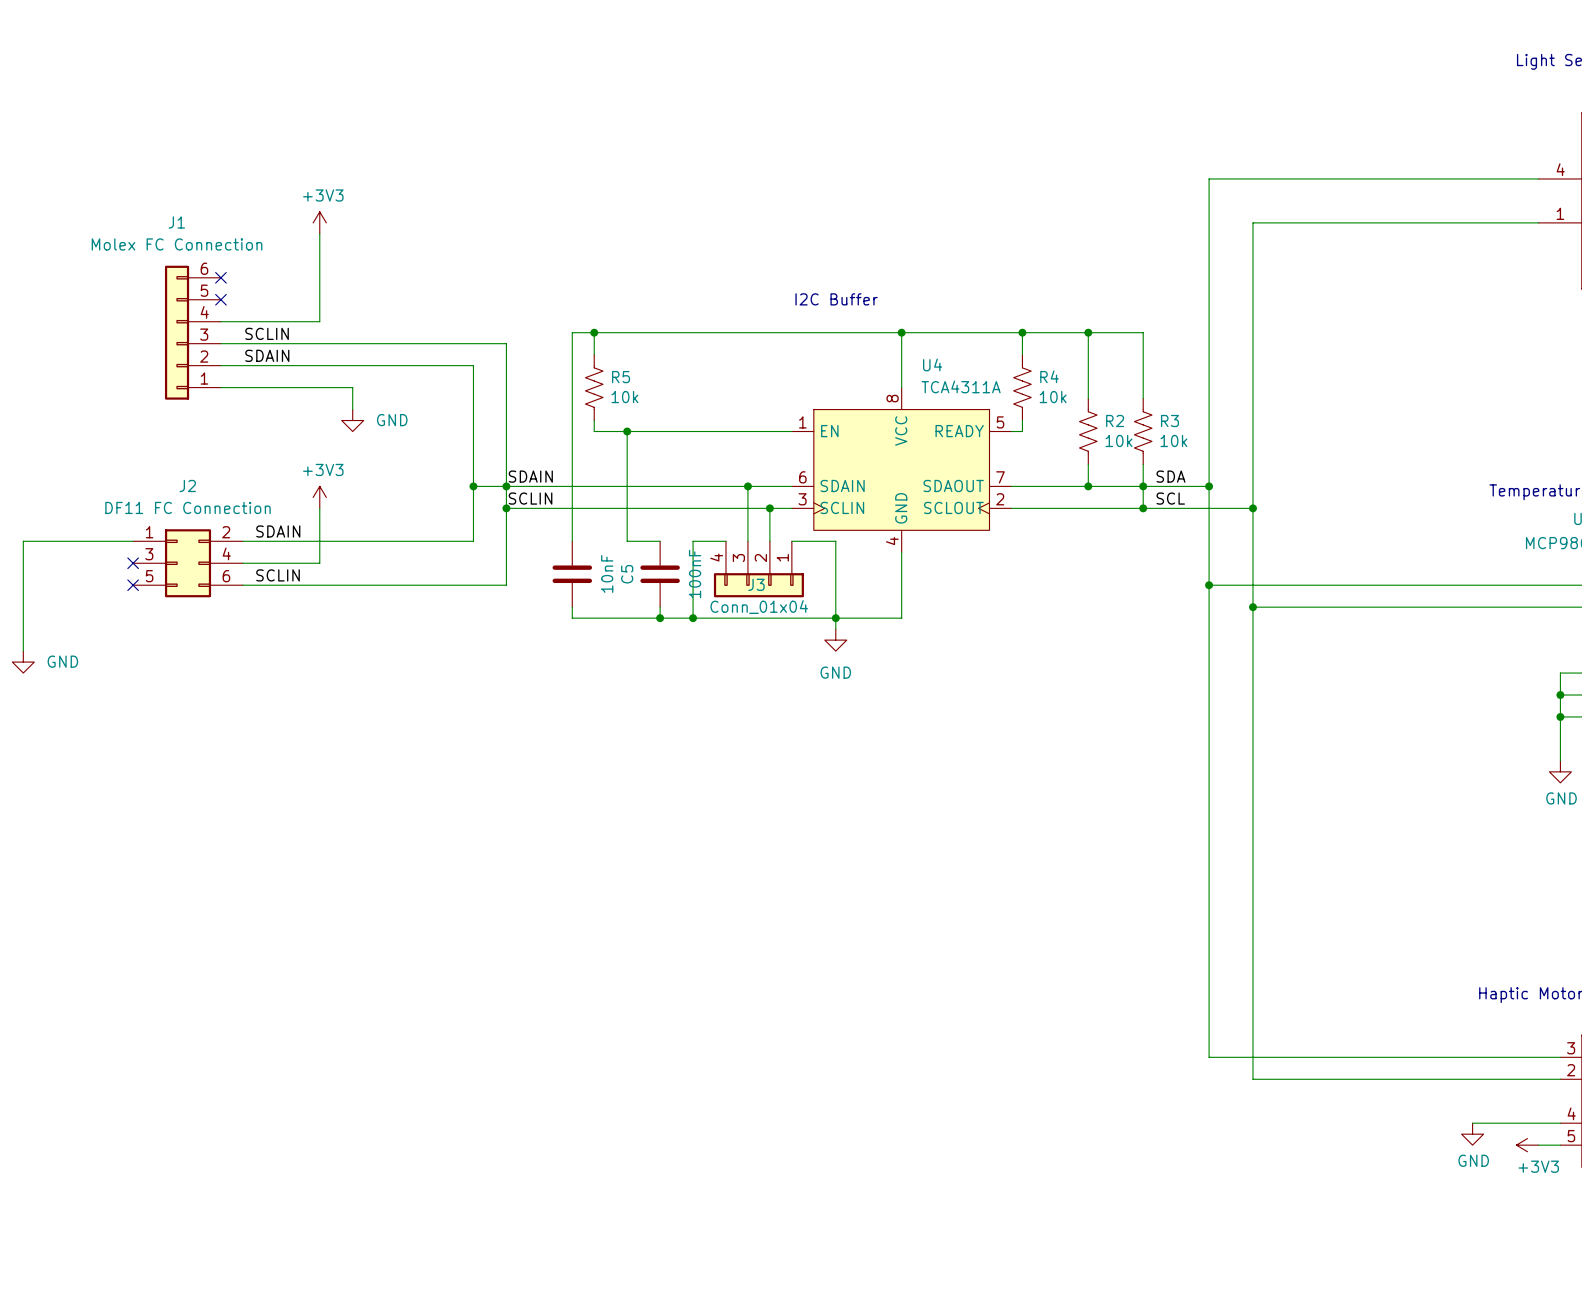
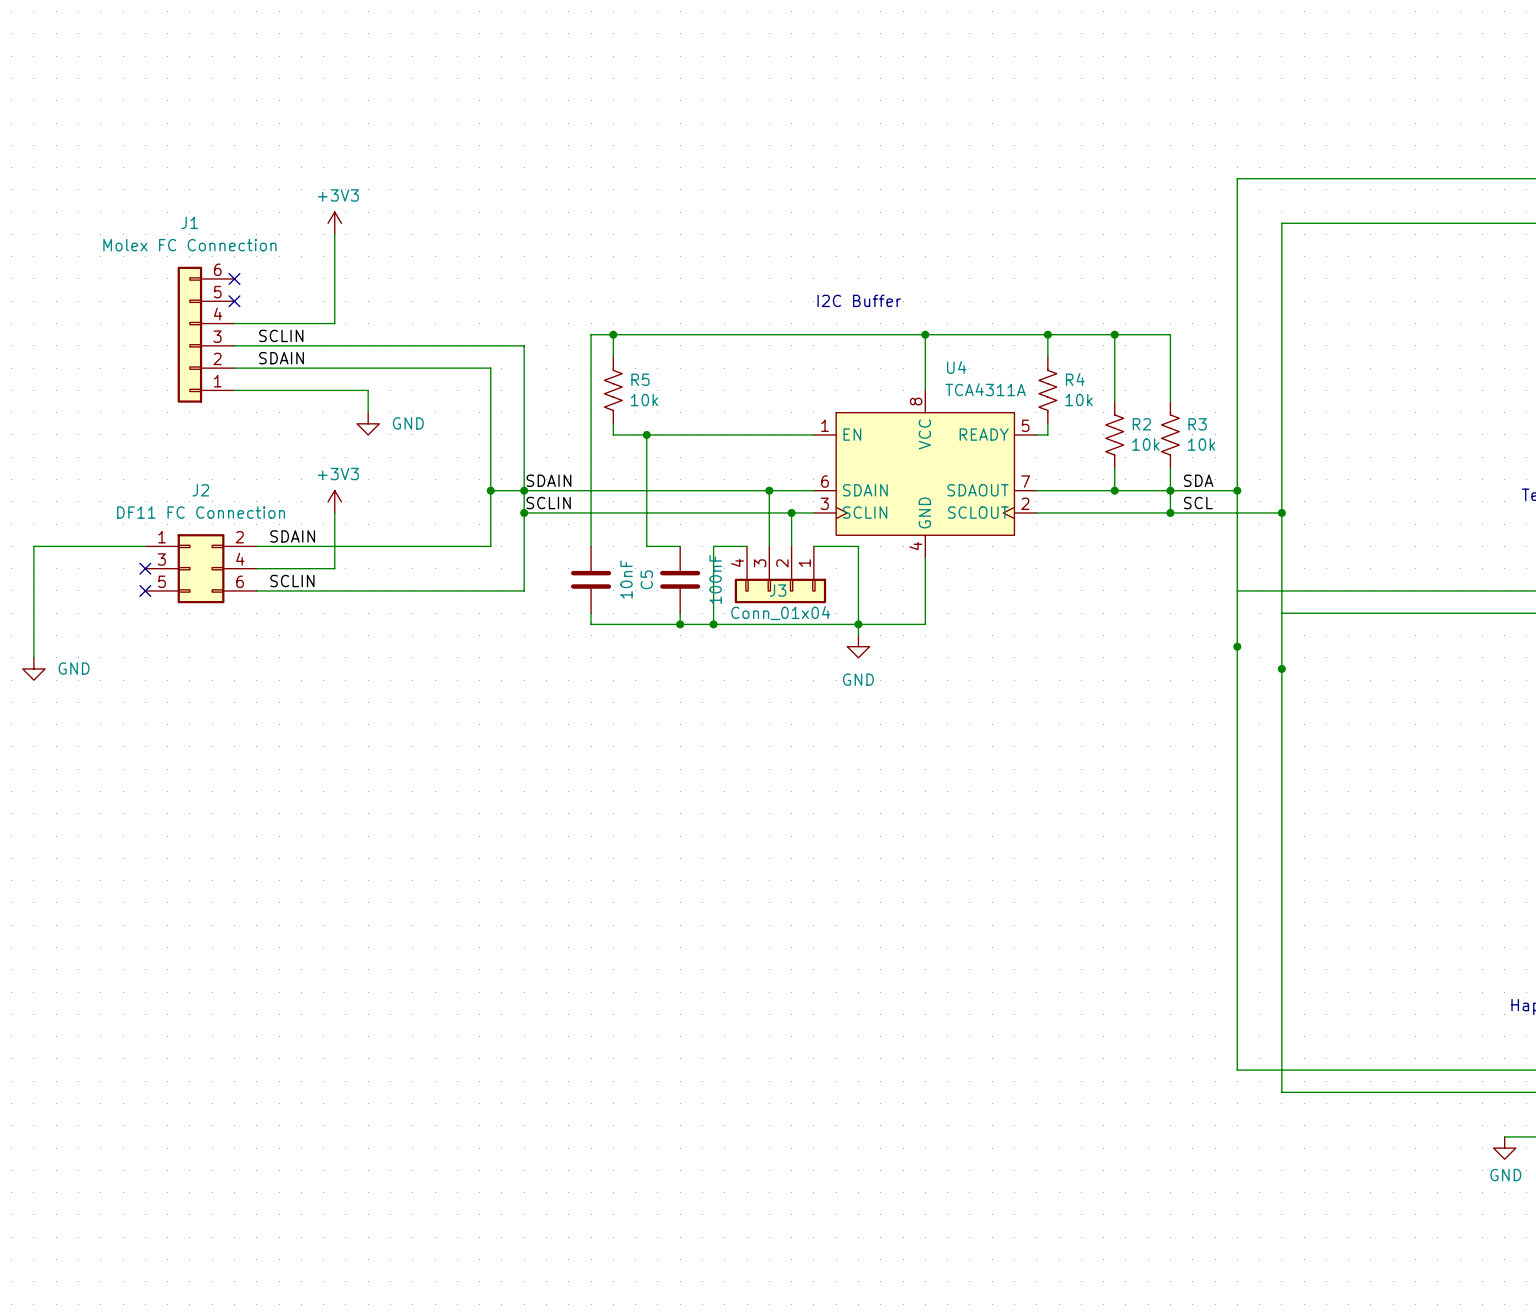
junction: (1209, 585) -> none
junction: (1253, 607) -> none
junction: none -> (1237, 646)
junction: none -> (1281, 668)

